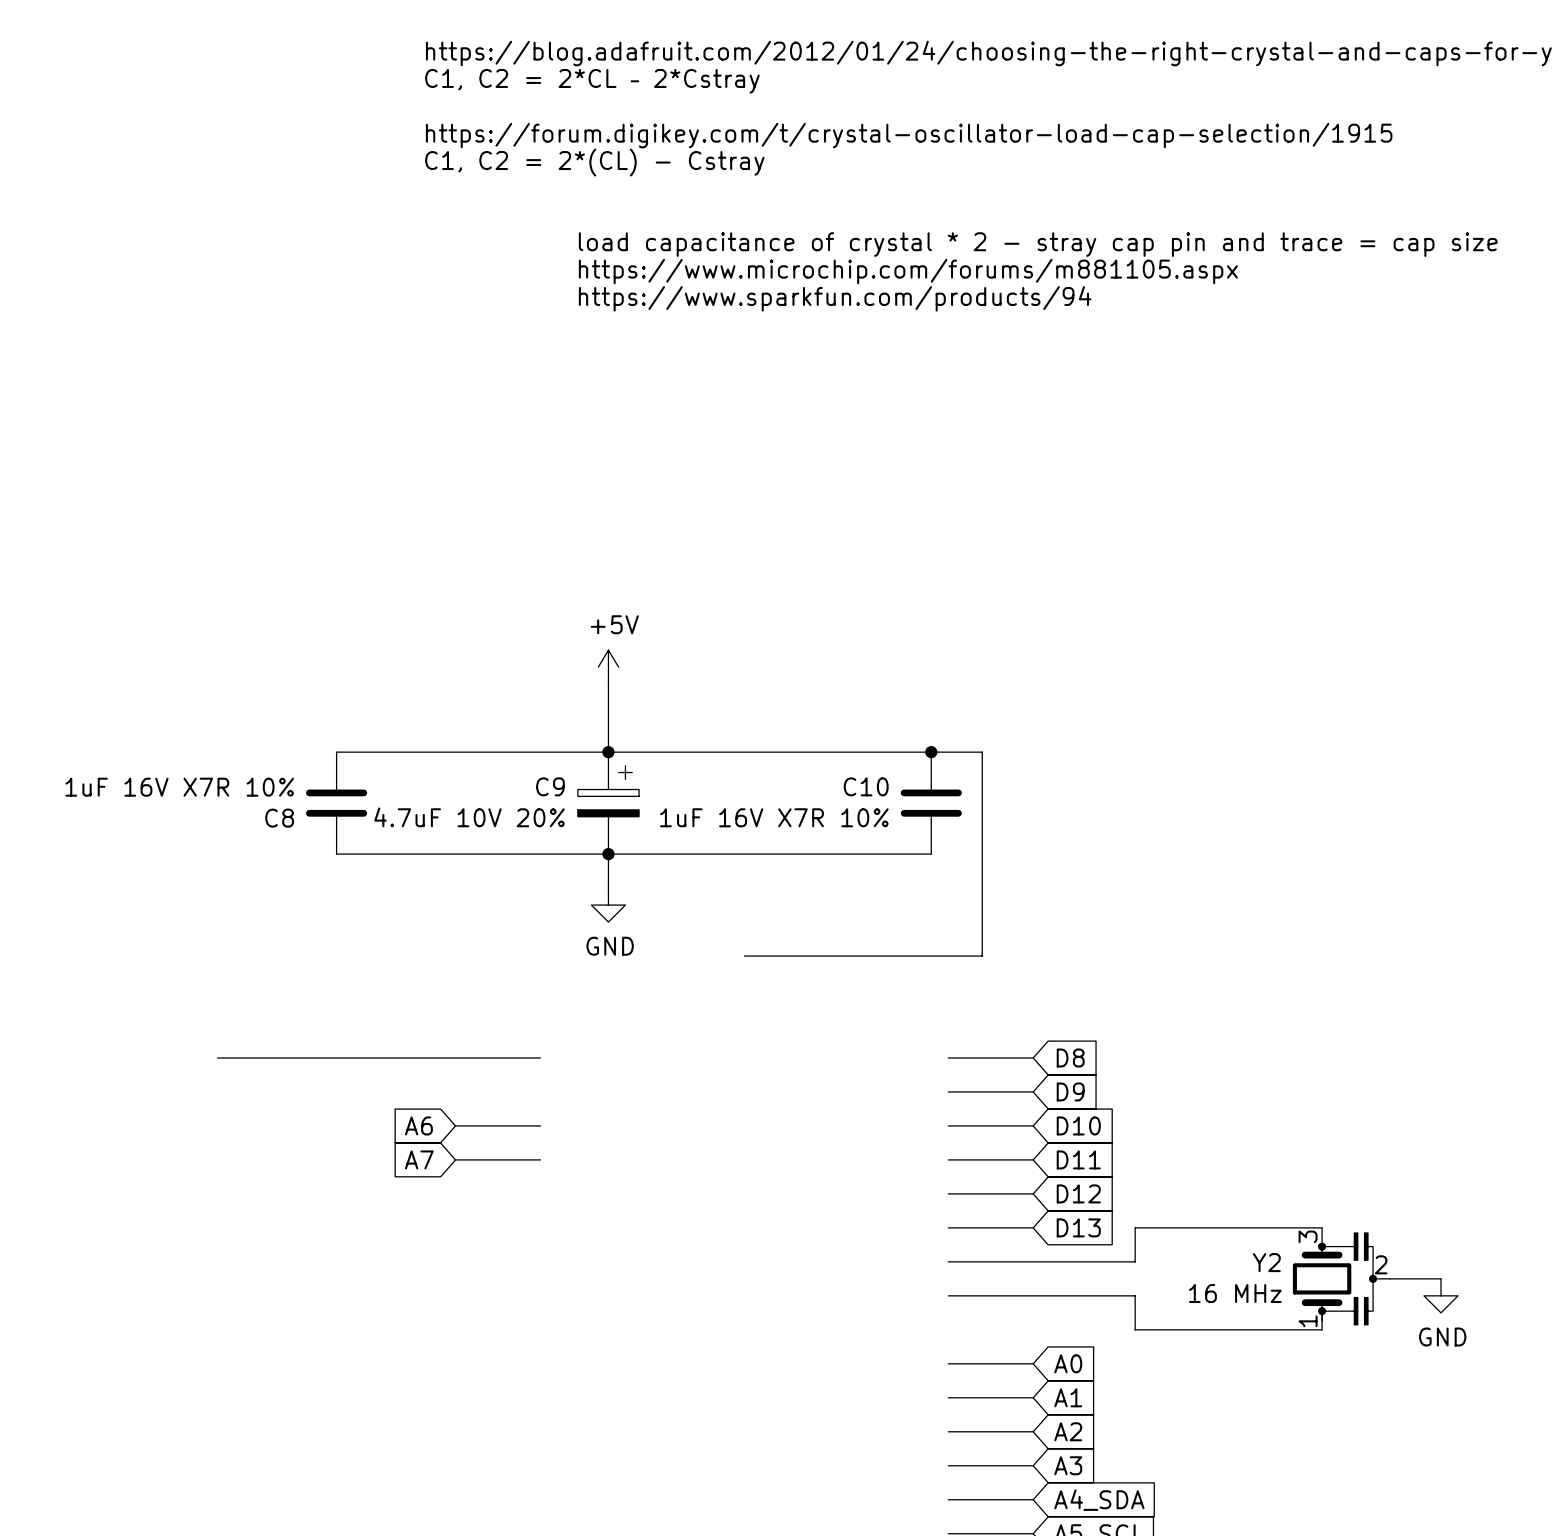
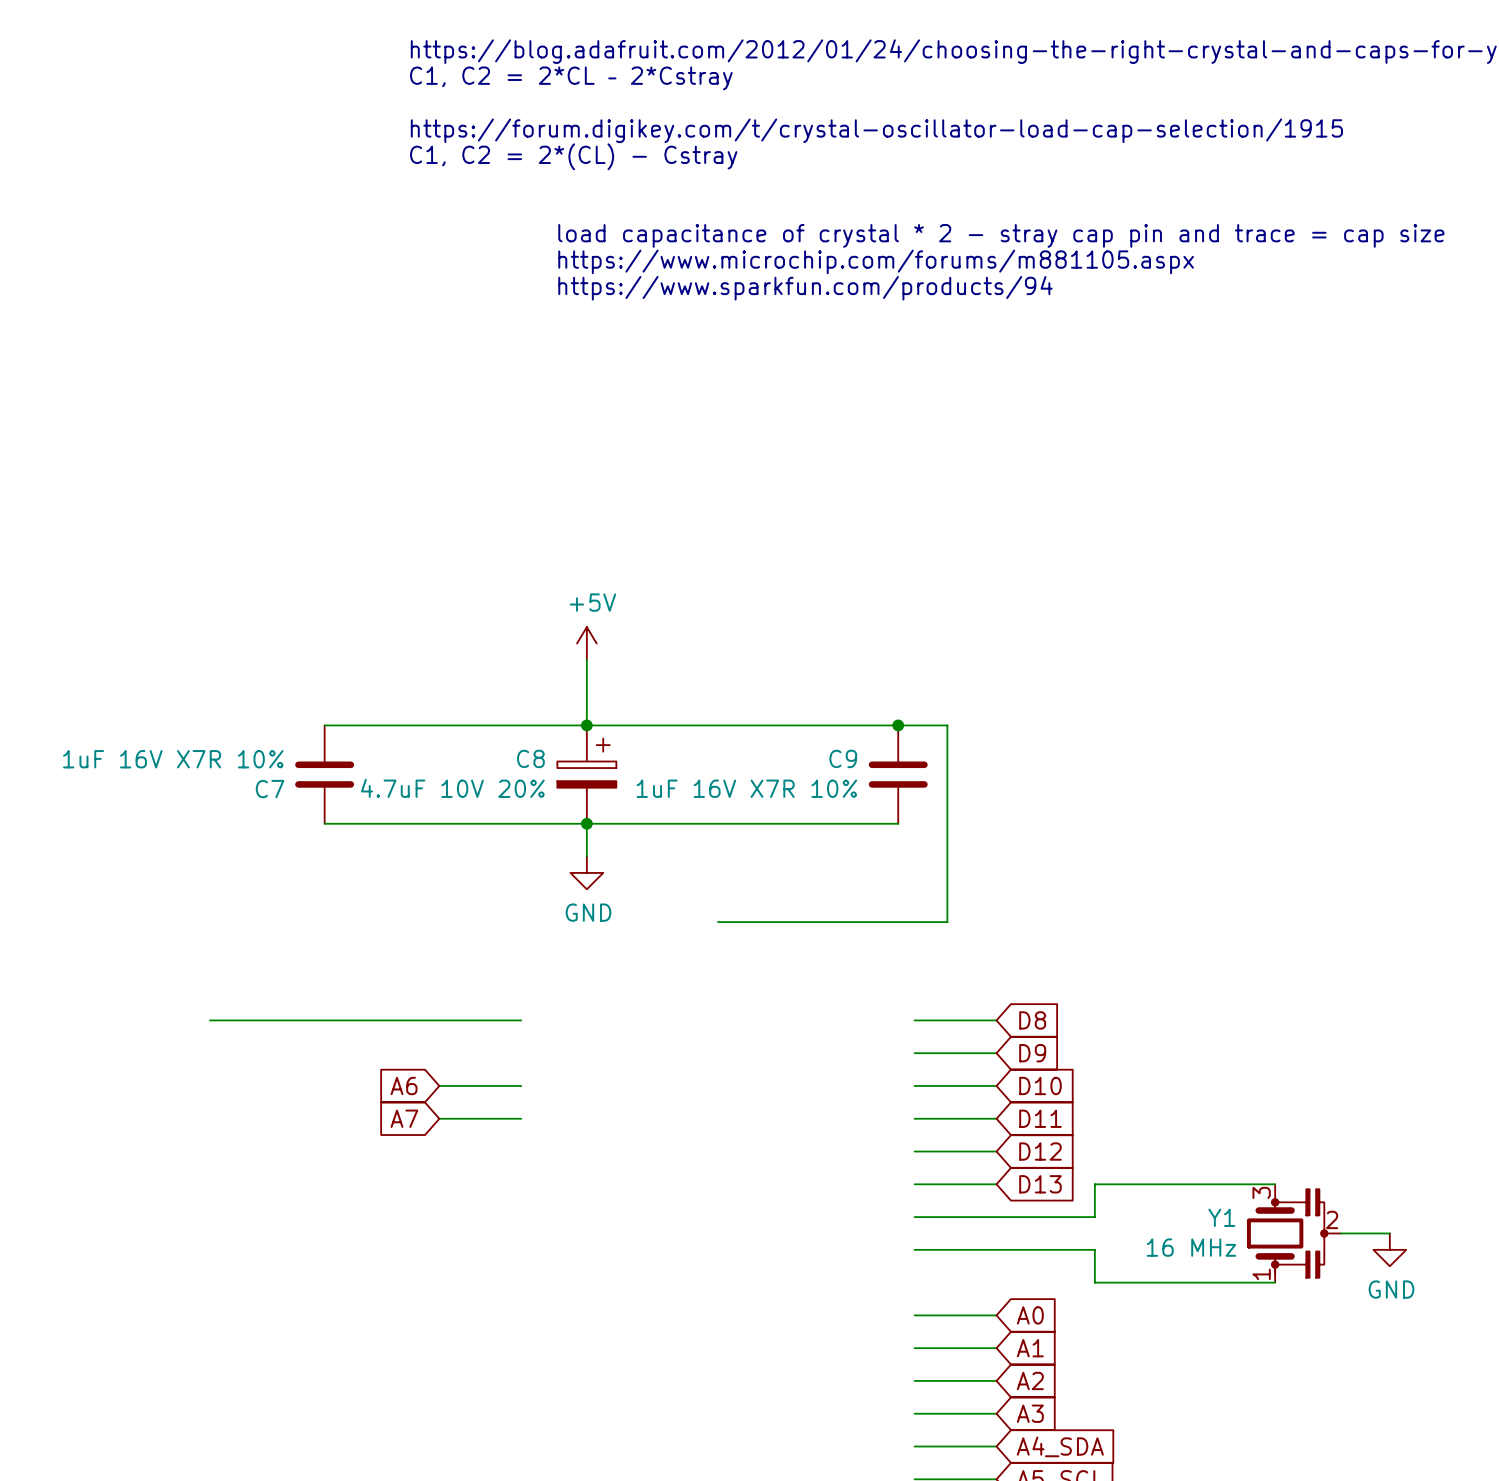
C9 name: C9 (550, 786) -> C8 (530, 758)
C10 name: C10 (866, 786) -> C9 (843, 758)
C8 name: C8 (279, 818) -> C7 (270, 789)
Y2 name: Y2 (1266, 1262) -> Y1 (1221, 1217)

